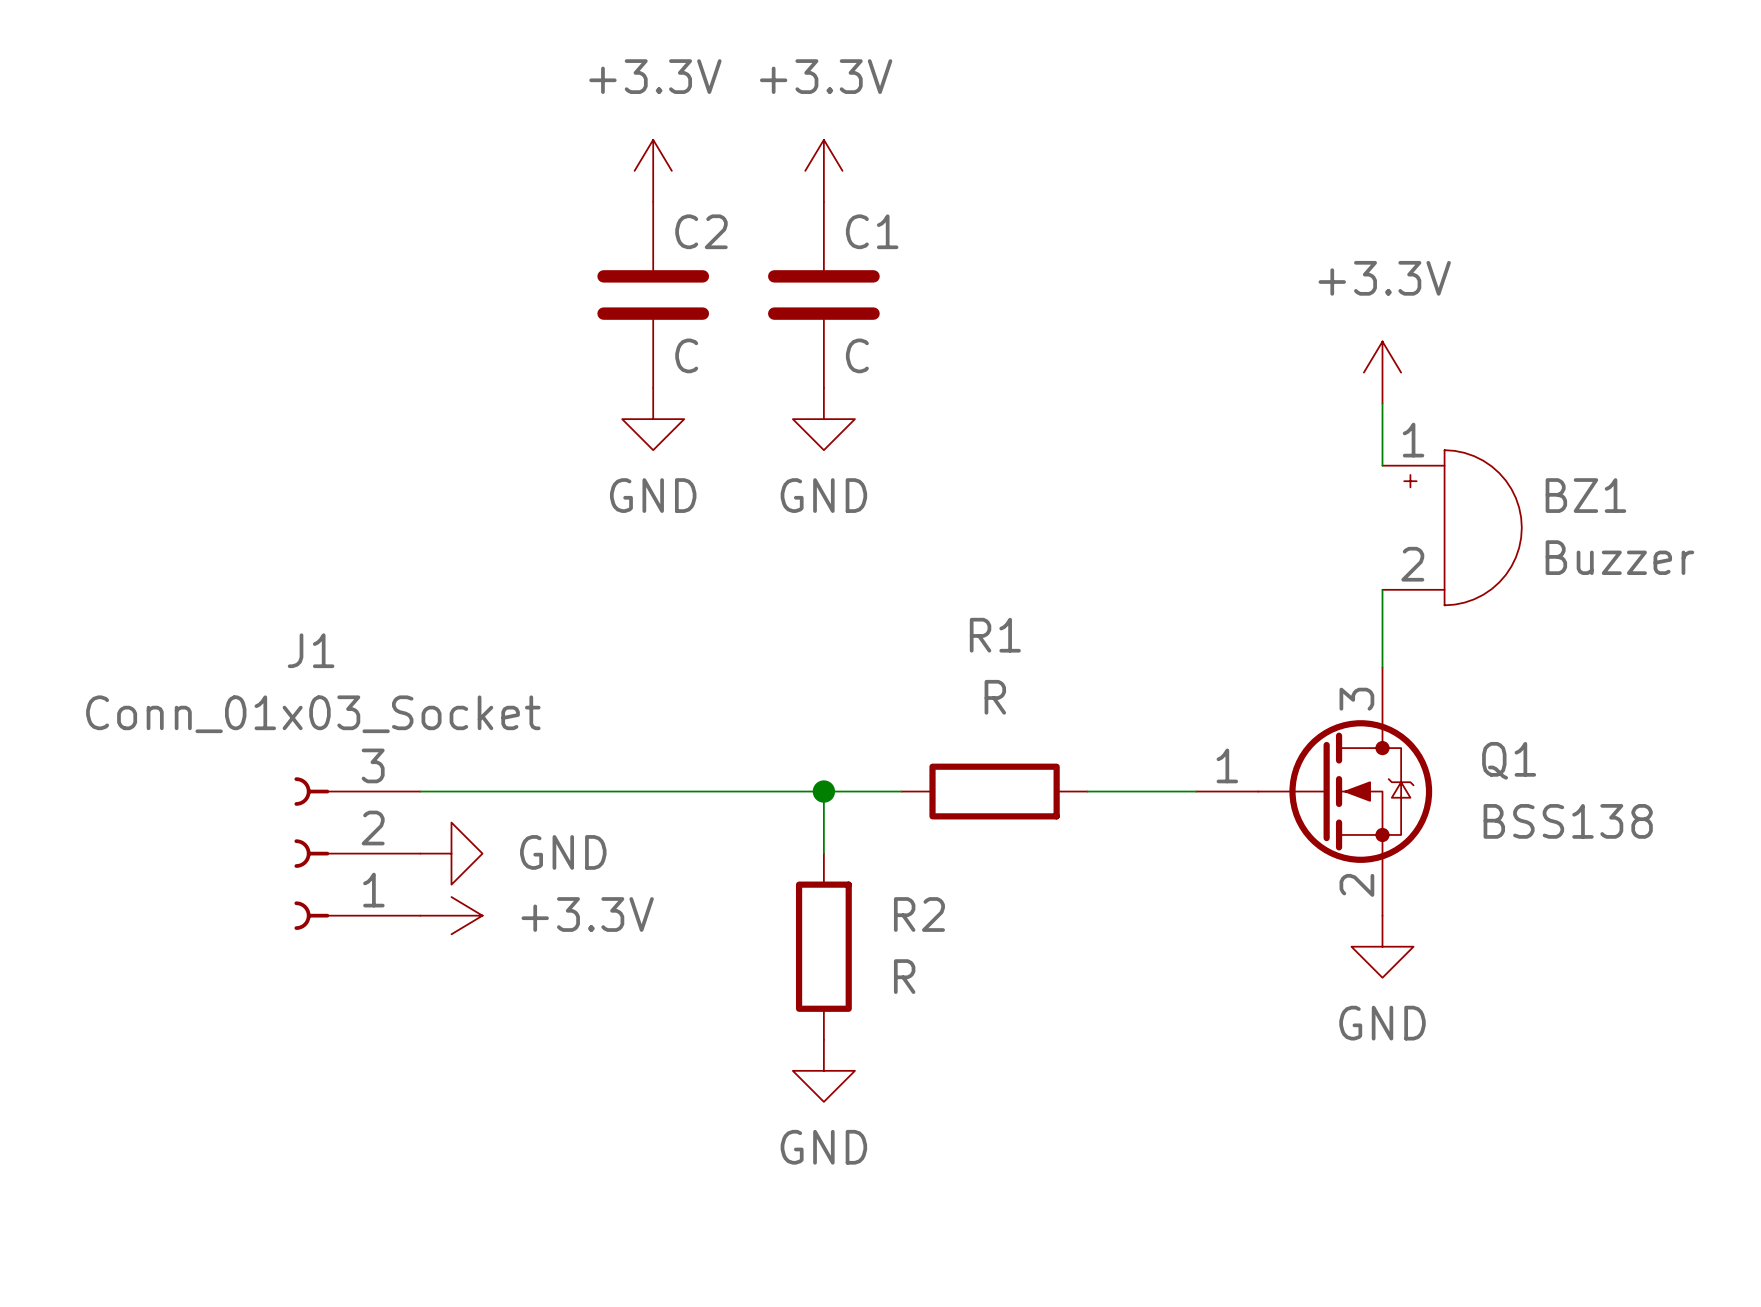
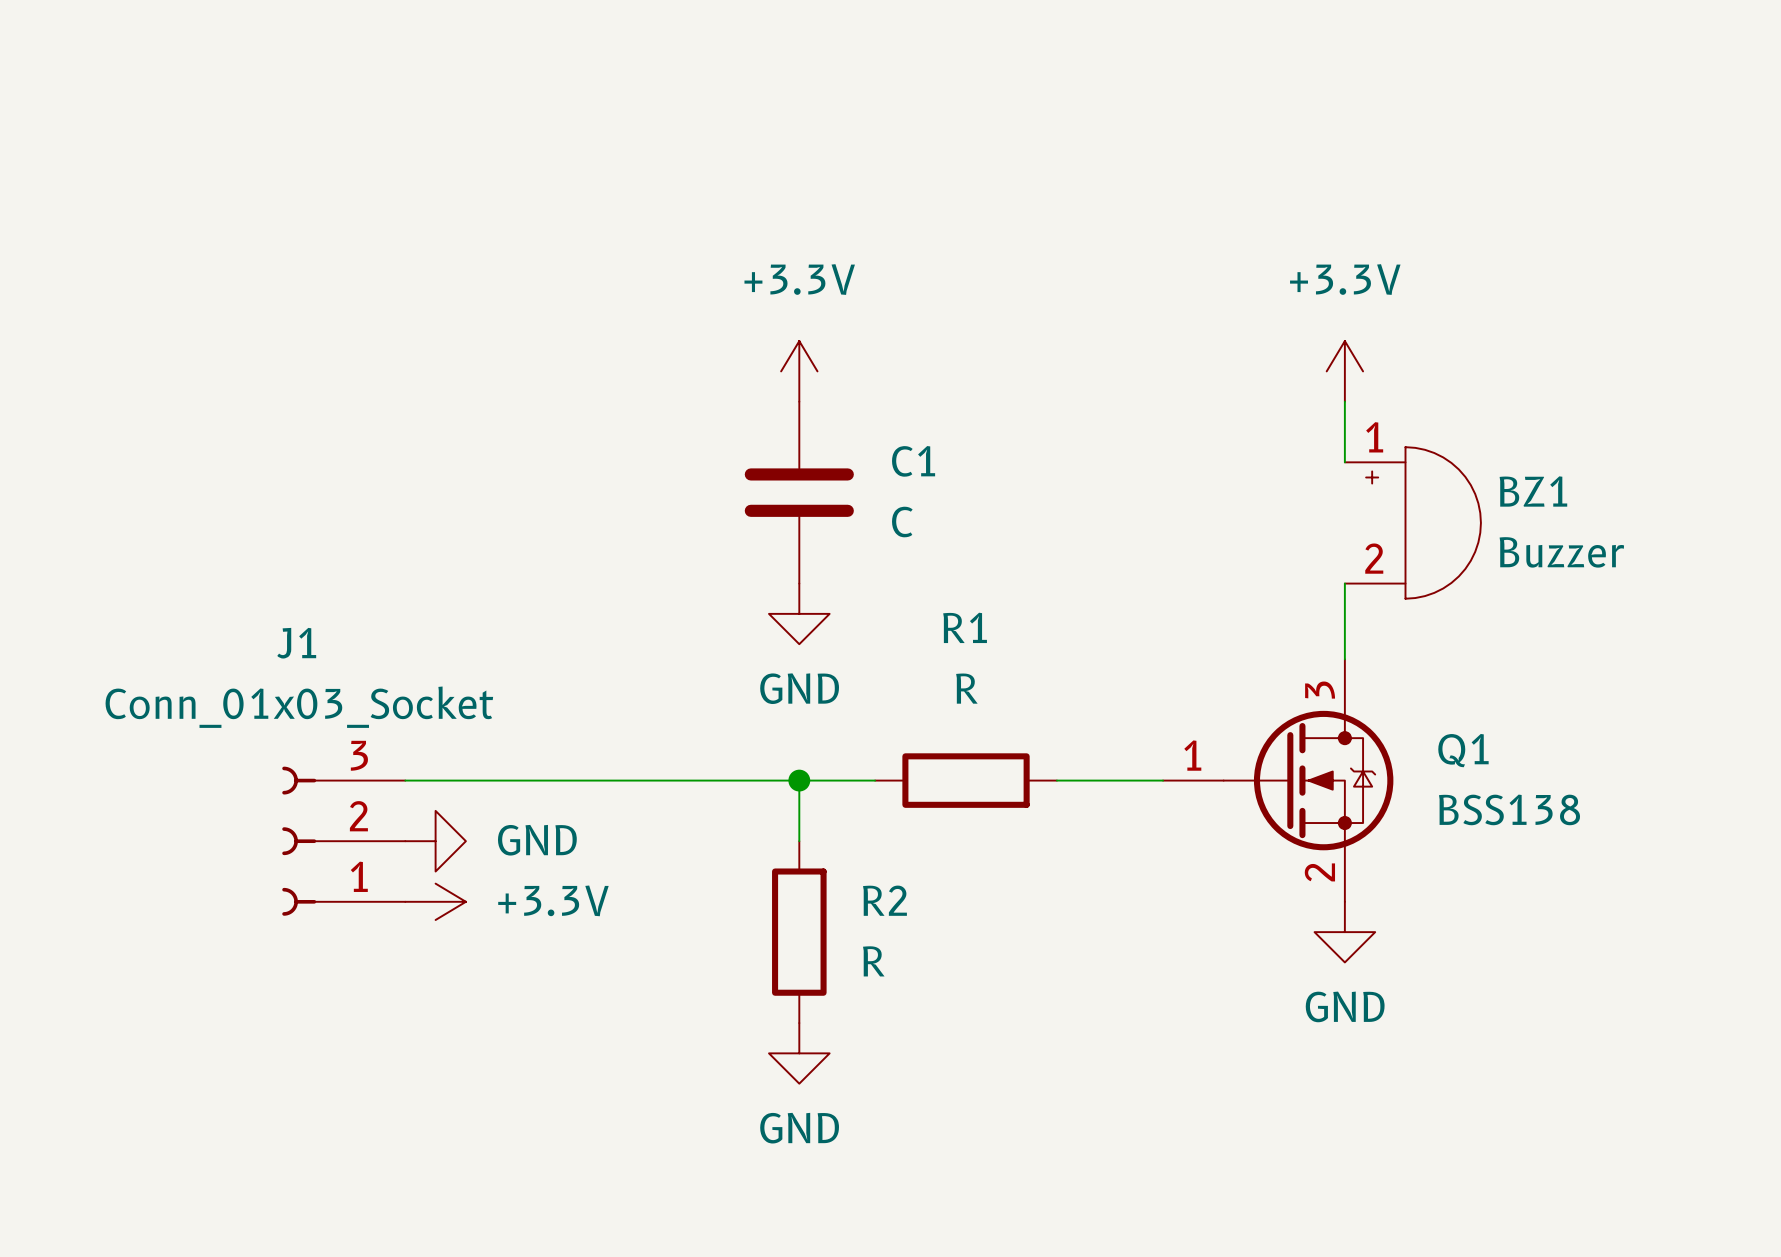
power symbol: +3.3V (653, 170) -> none
power symbol: +3.3V (823, 170) -> none
C1 name position: C1 (872, 231) -> C1 (913, 461)
C2: C (653, 294) -> none
C1 position: (823, 294) -> (799, 492)
C1 value position: C (857, 355) -> C (902, 522)
power symbol: none -> +3.3V (799, 371)
power symbol: GND (653, 419) -> none
power symbol: GND (823, 419) -> none
power symbol: none -> GND (799, 613)

